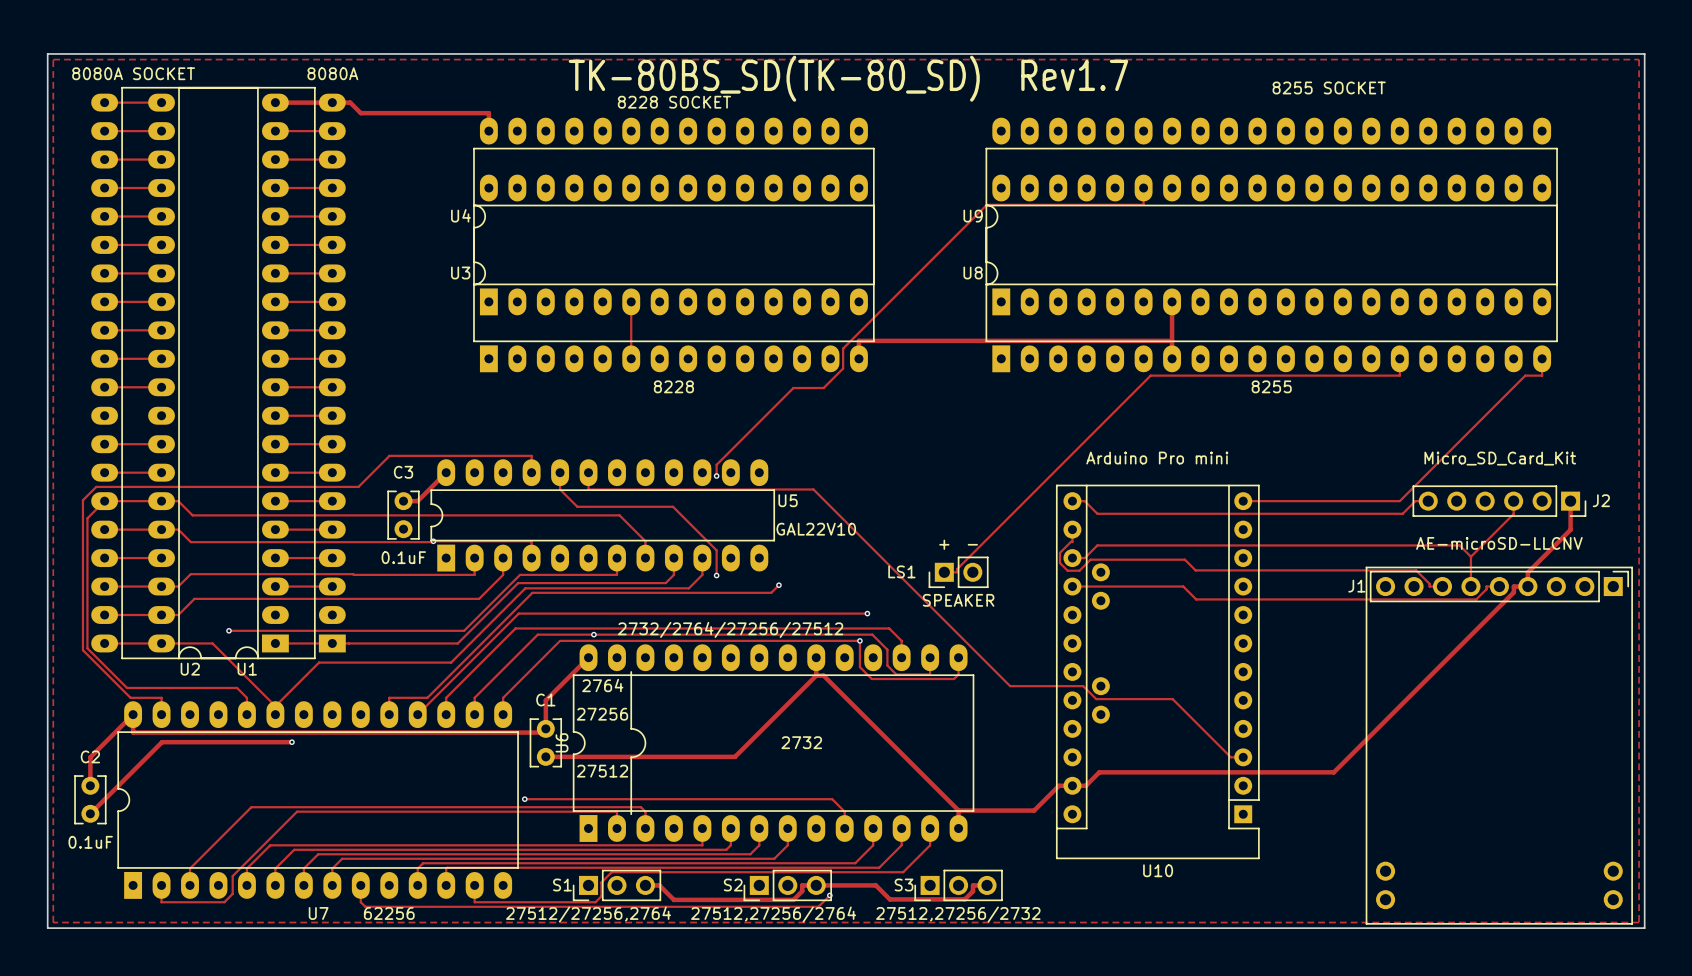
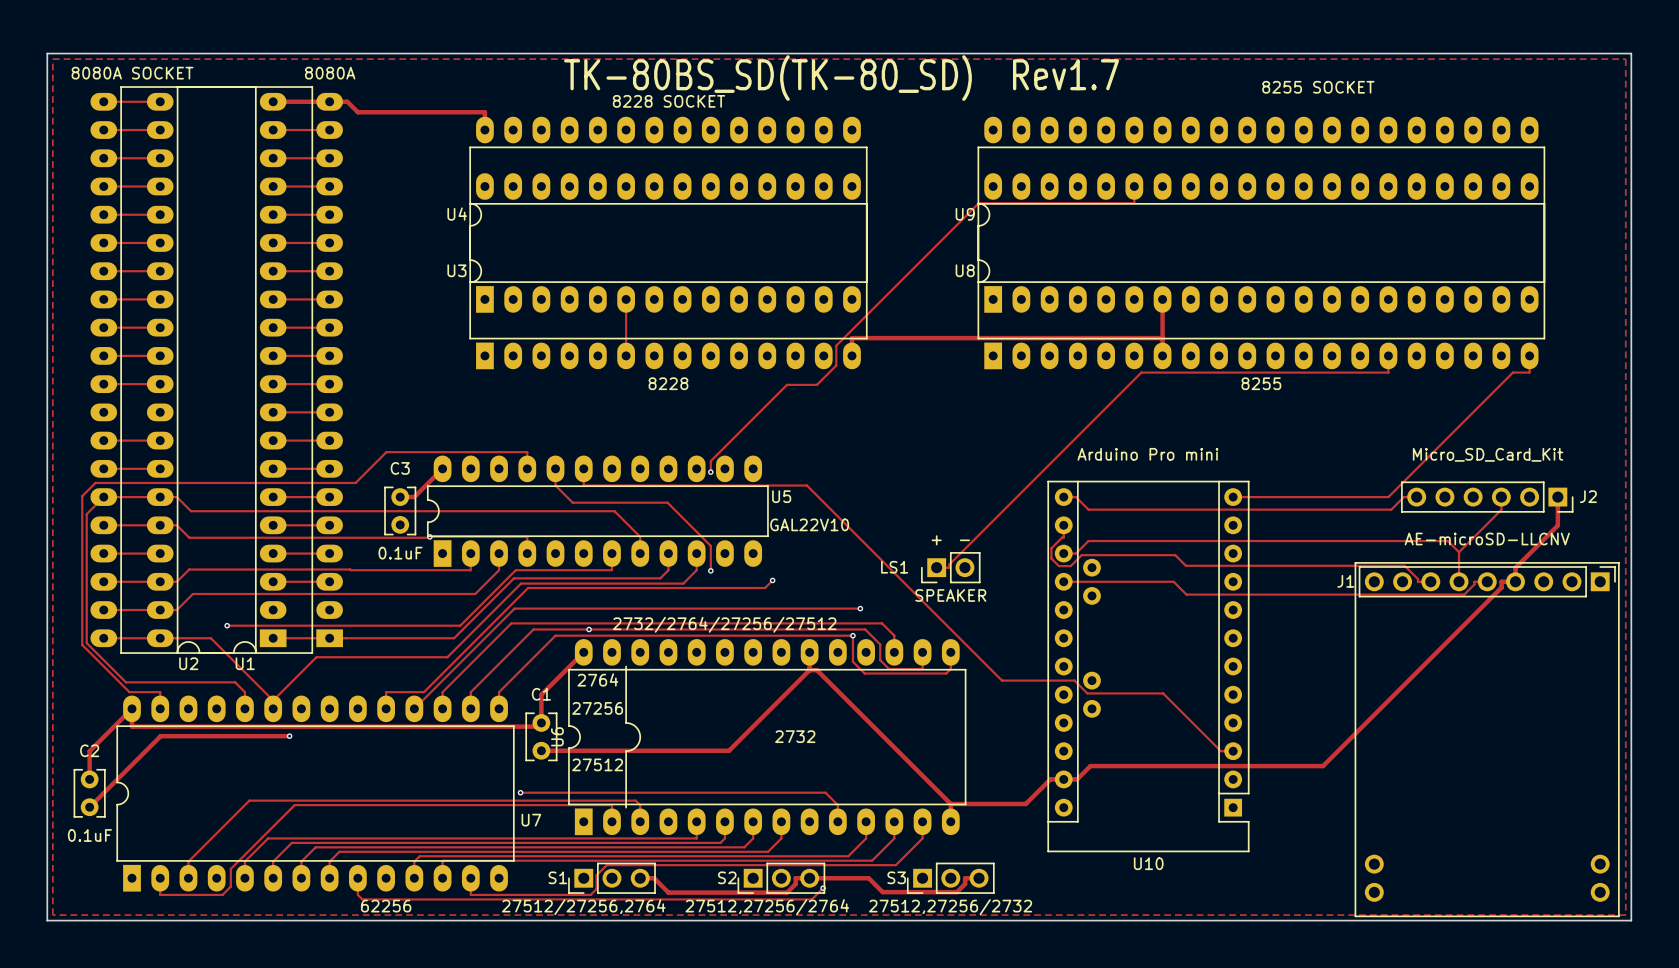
U7 name position: U7 (318, 913) -> U7 (531, 820)

